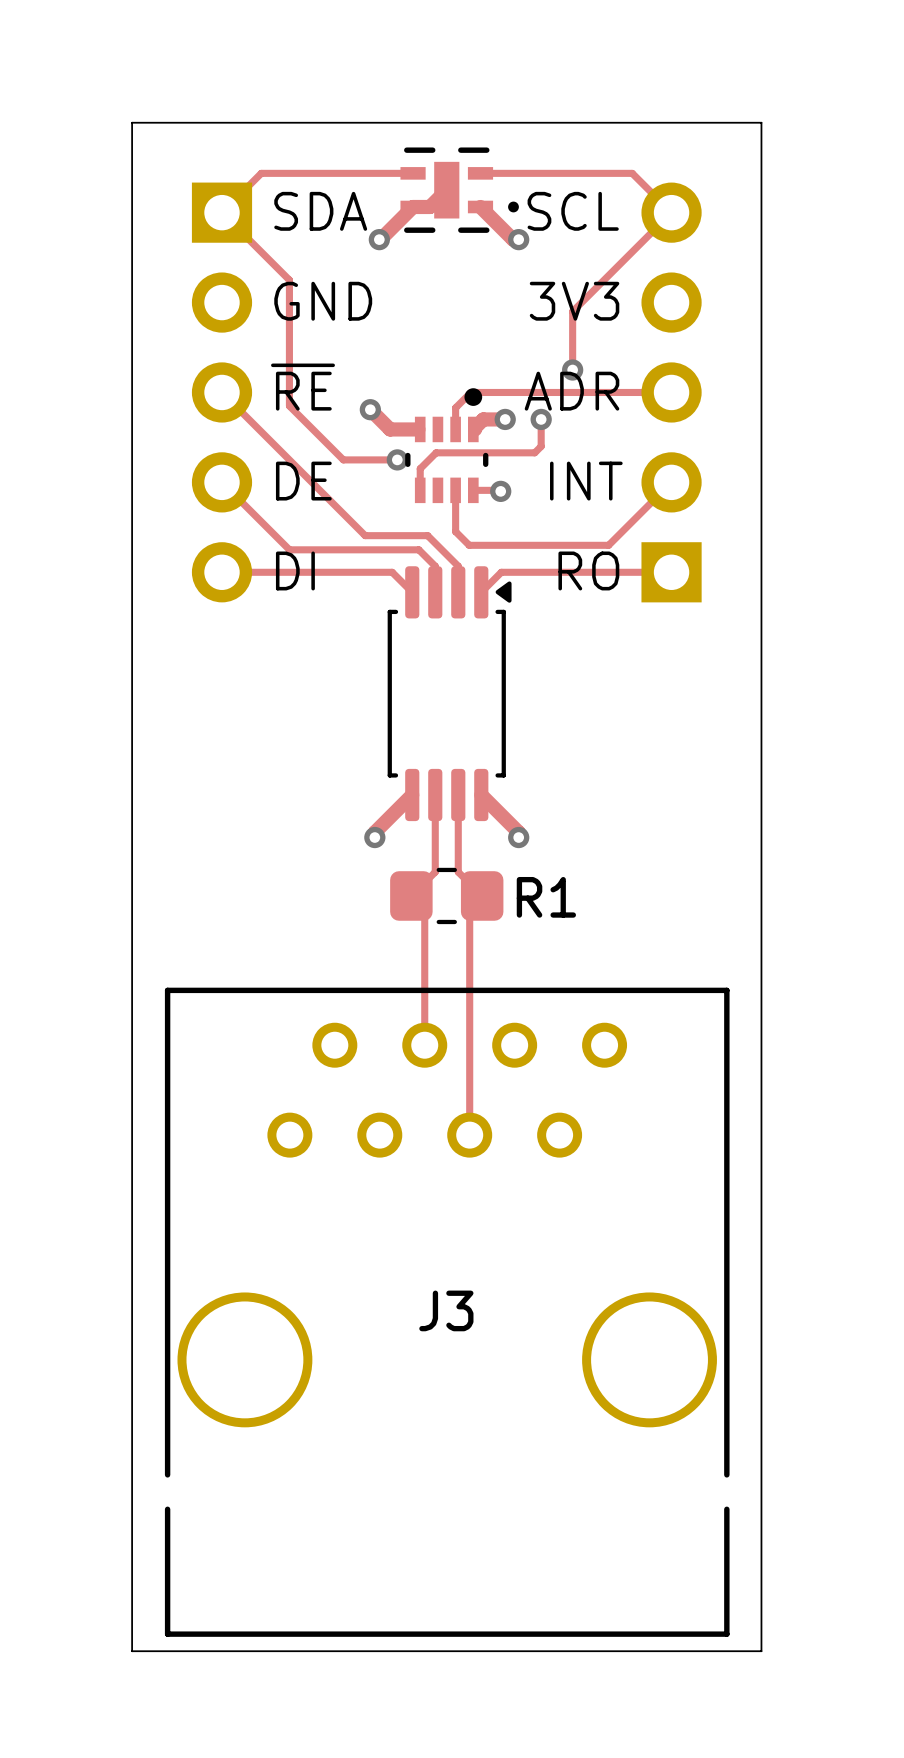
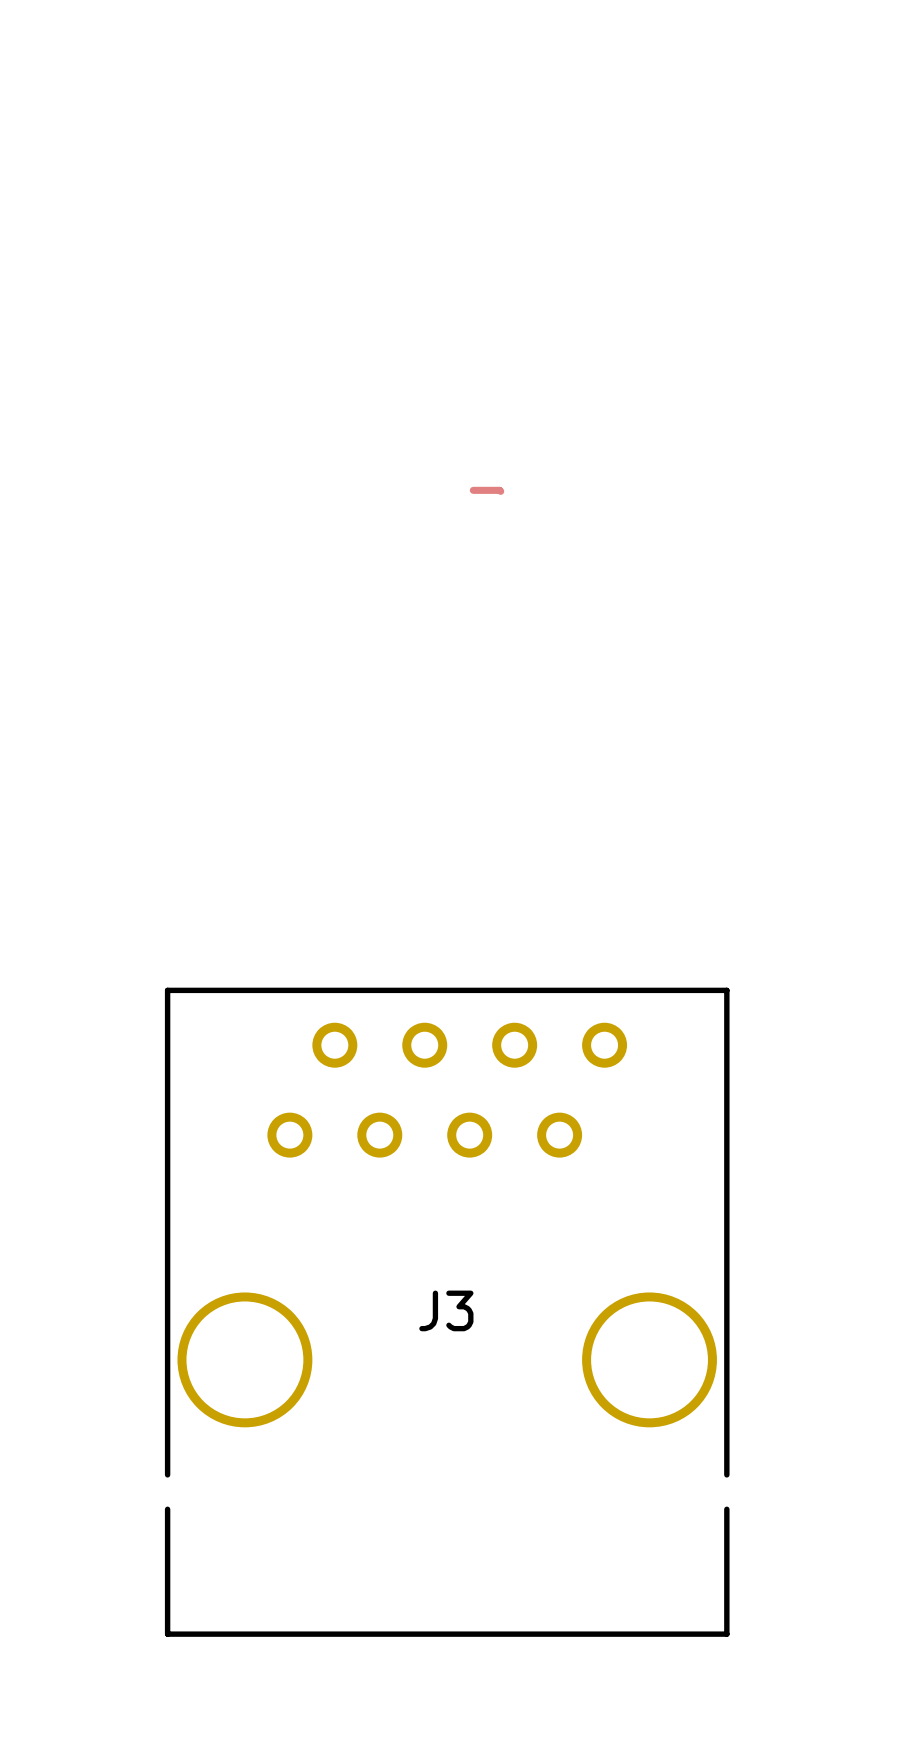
board edge: (132, 122) (761, 122) (761, 1651) (132, 1651) (132, 122) -> none
track: (413, 173) (261, 173) (222, 212) (289, 280) (289, 405) (343, 459) (397, 459) -> none
track: (480, 173) (632, 173) (671, 212) (572, 311) (572, 369) -> none
track: (446, 190) (429, 206) (413, 206) (379, 239) -> none
part: (459, 190) -> none
track: (480, 206) (513, 239) (518, 239) -> none
text: SDA (320, 211) -> none
text: SCL (573, 211) -> none
via: (379, 239) -> none
via: (518, 239) -> none
text: GND (323, 301) -> none
text: 3V3 (574, 301) -> none
via: (572, 369) -> none
text: ~{RE} (302, 387) -> none
text: ADR (572, 391) -> none
track: (222, 392) (365, 535) (427, 535) (458, 566) (458, 592) -> none
part: (222, 392) -> none
track: (671, 392) (471, 392) (455, 407) (455, 429) -> none
part: (671, 392) -> none
track: (370, 409) (390, 429) (418, 429) -> none
via: (370, 409) -> none
track: (505, 419) (483, 419) (475, 429) -> none
via: (505, 419) -> none
track: (541, 419) (541, 446) (534, 452) (436, 452) (420, 468) (420, 490) -> none
via: (541, 419) -> none
part: (446, 445) -> none
via: (397, 459) -> none
text: DE (303, 481) -> none
text: INT (586, 481) -> none
track: (222, 482) (289, 549) (418, 549) (435, 566) (435, 592) -> none
track: (671, 482) (608, 545) (469, 545) (455, 531) (455, 490) -> none
via: (500, 491) -> none
text: DI (295, 570) -> none
text: RO (588, 570) -> none
track: (222, 572) (392, 572) (412, 592) -> none
track: (671, 572) (501, 572) (481, 592) -> none
part: (449, 693) -> none
track: (412, 795) (374, 832) (374, 837) -> none
track: (435, 795) (435, 872) (411, 895) (424, 909) (424, 1045) -> none
track: (458, 795) (458, 872) (482, 895) (469, 908) (469, 1135) -> none
track: (481, 795) (518, 832) (518, 837) -> none
via: (374, 837) -> none
via: (518, 837) -> none
R1: (446, 895) -> none

